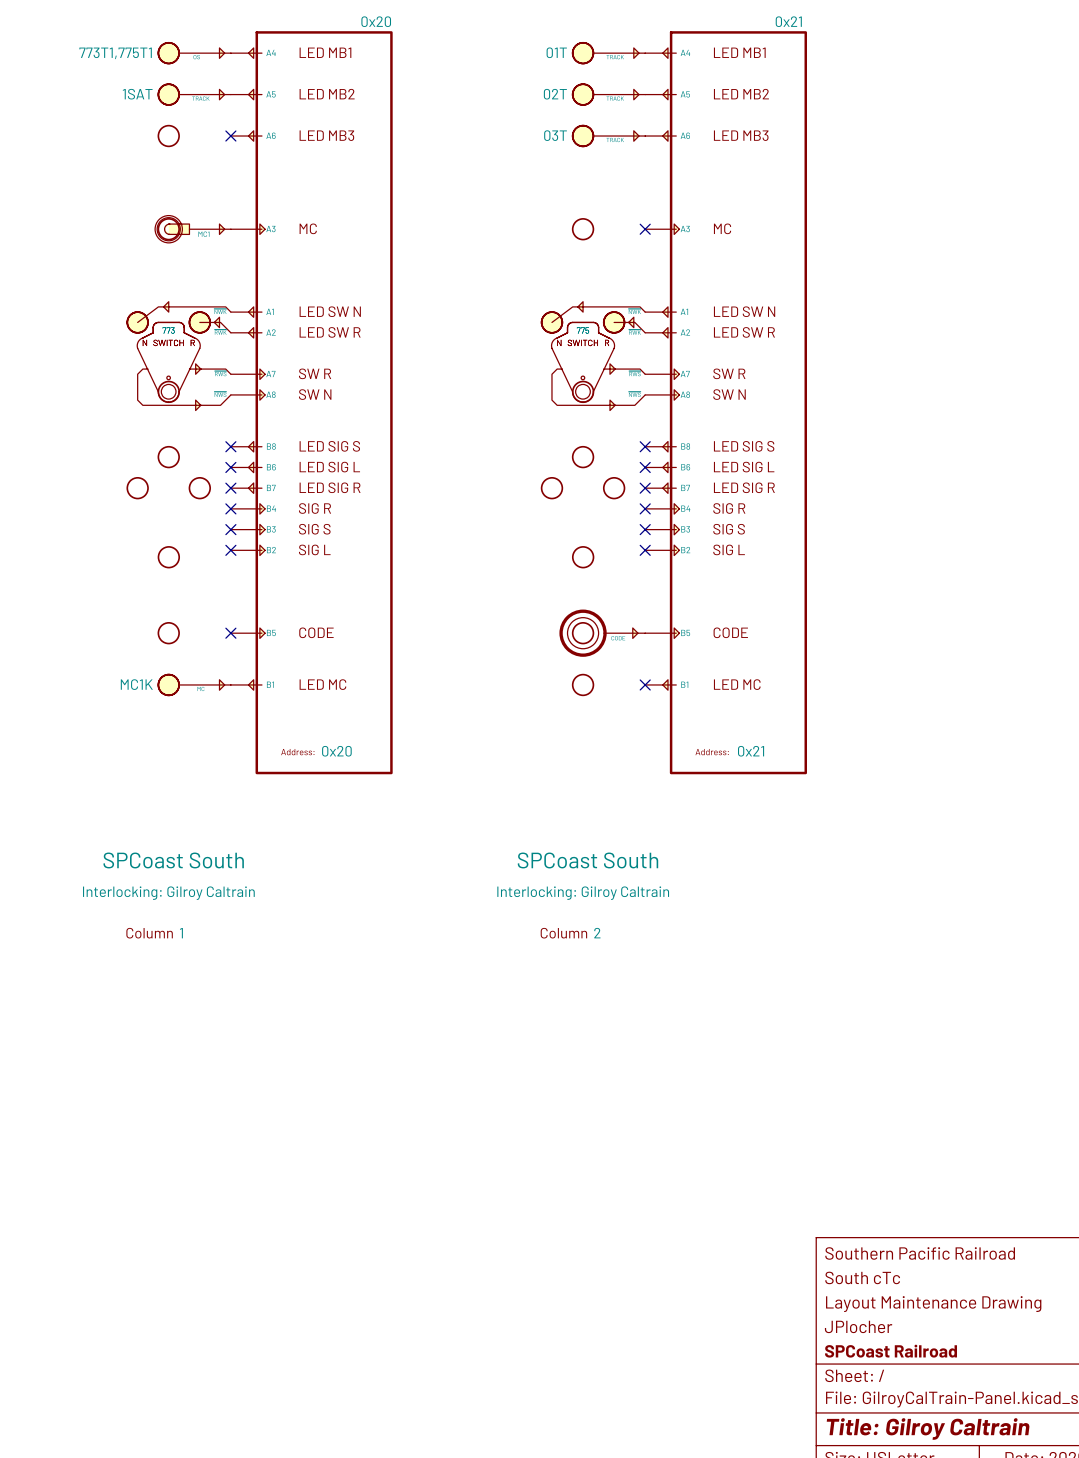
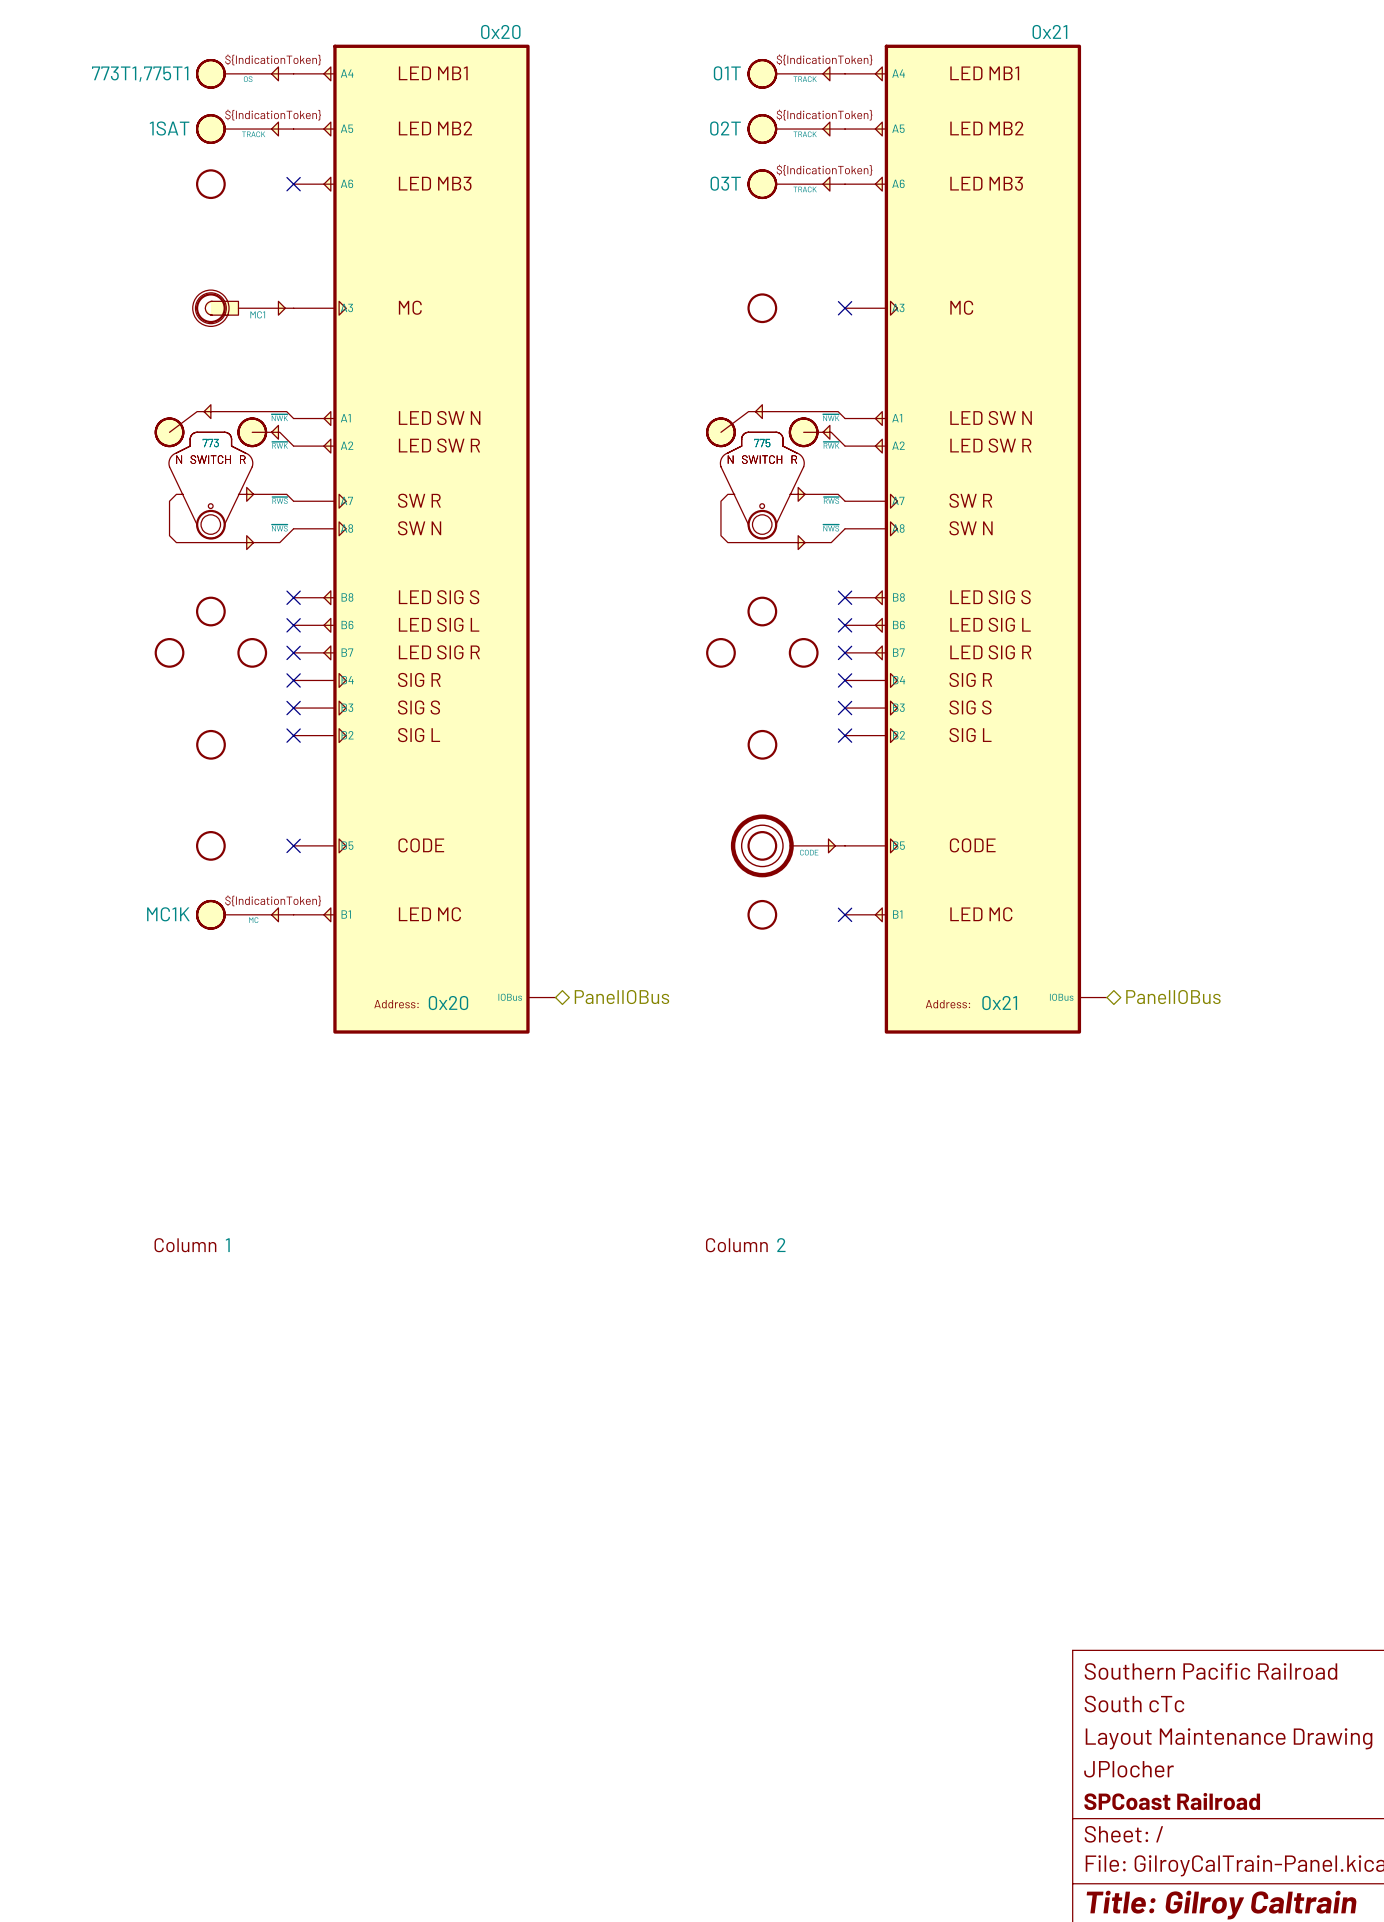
part symbol: [157, 41, 231, 65] -> [195, 58, 294, 89]
part symbol: [571, 41, 646, 65] -> [747, 58, 846, 89]
part symbol: [157, 83, 231, 106] -> [195, 114, 294, 144]
part symbol: [571, 83, 646, 106] -> [747, 114, 846, 144]
part symbol: [571, 124, 646, 148] -> [747, 169, 846, 200]
part: 0x20 (311, 402) -> none
part: none -> 0x20 (424, 539)
part: 0x21 (726, 402) -> none
part: none -> 0x21 (976, 539)
part symbol: [157, 673, 231, 697] -> [195, 899, 294, 930]
hierarchical label: none -> PanelIOBus (621, 997)
hierarchical label: none -> PanelIOBus (1173, 997)
part text: SPCoast South (173, 860) -> none
part text: SPCoast South (587, 860) -> none
part text: Interlocking: Gilroy Caltrain (168, 893) -> none
part text: Interlocking: Gilroy Caltrain (583, 893) -> none

